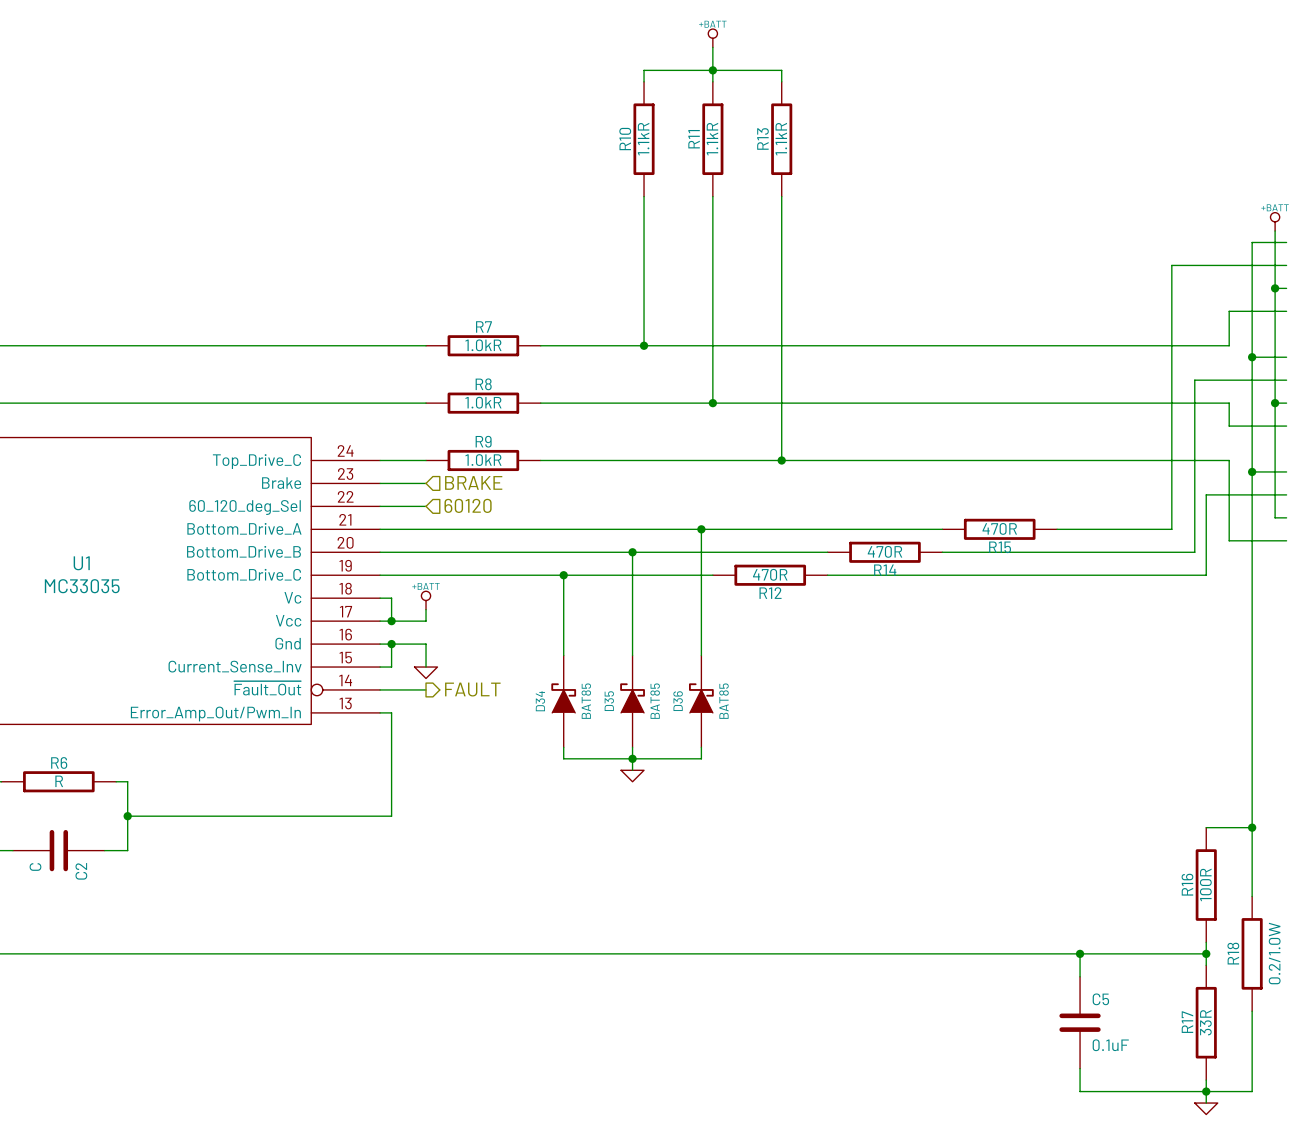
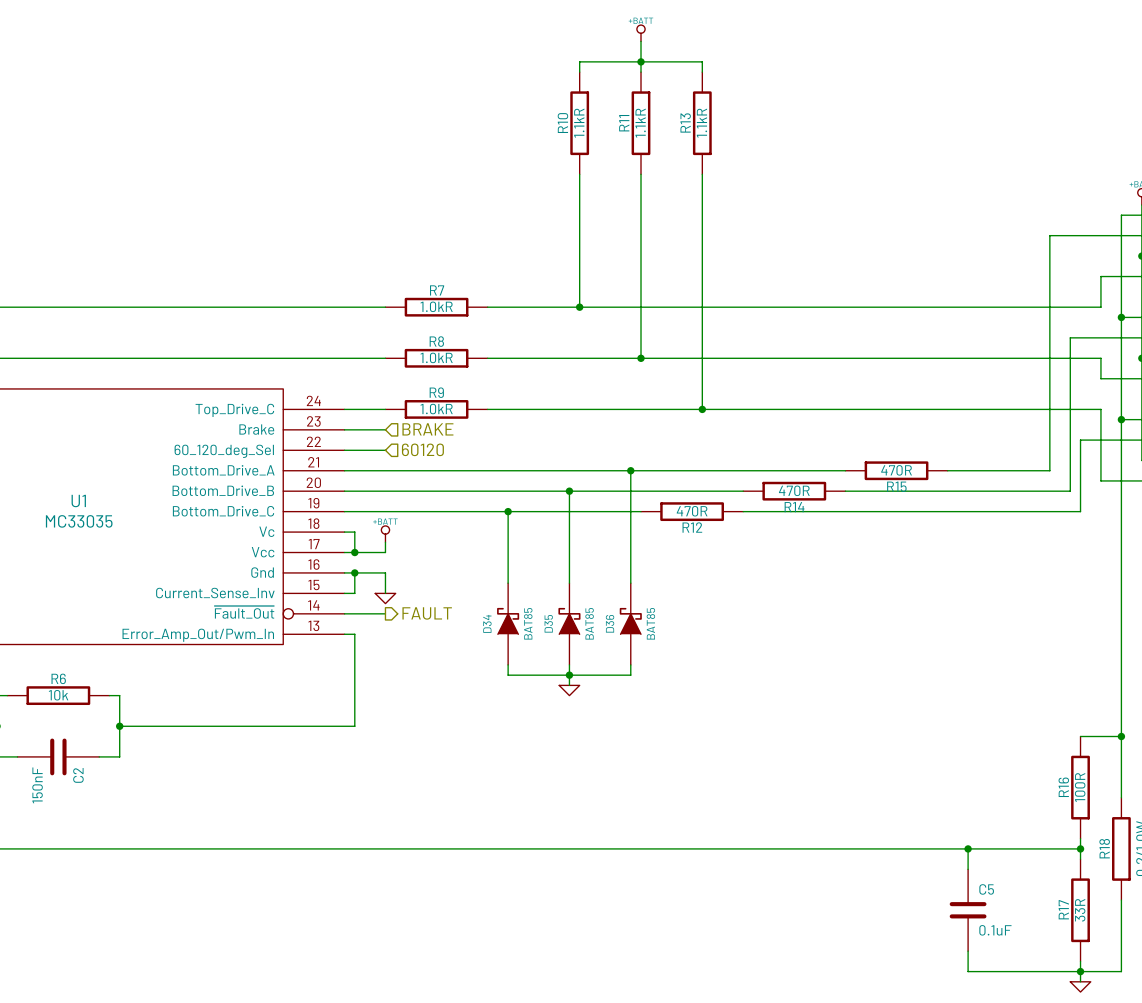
R6 value: R (59, 781) -> 10k (58, 695)
C2 value: C (35, 867) -> 150nF (37, 785)

